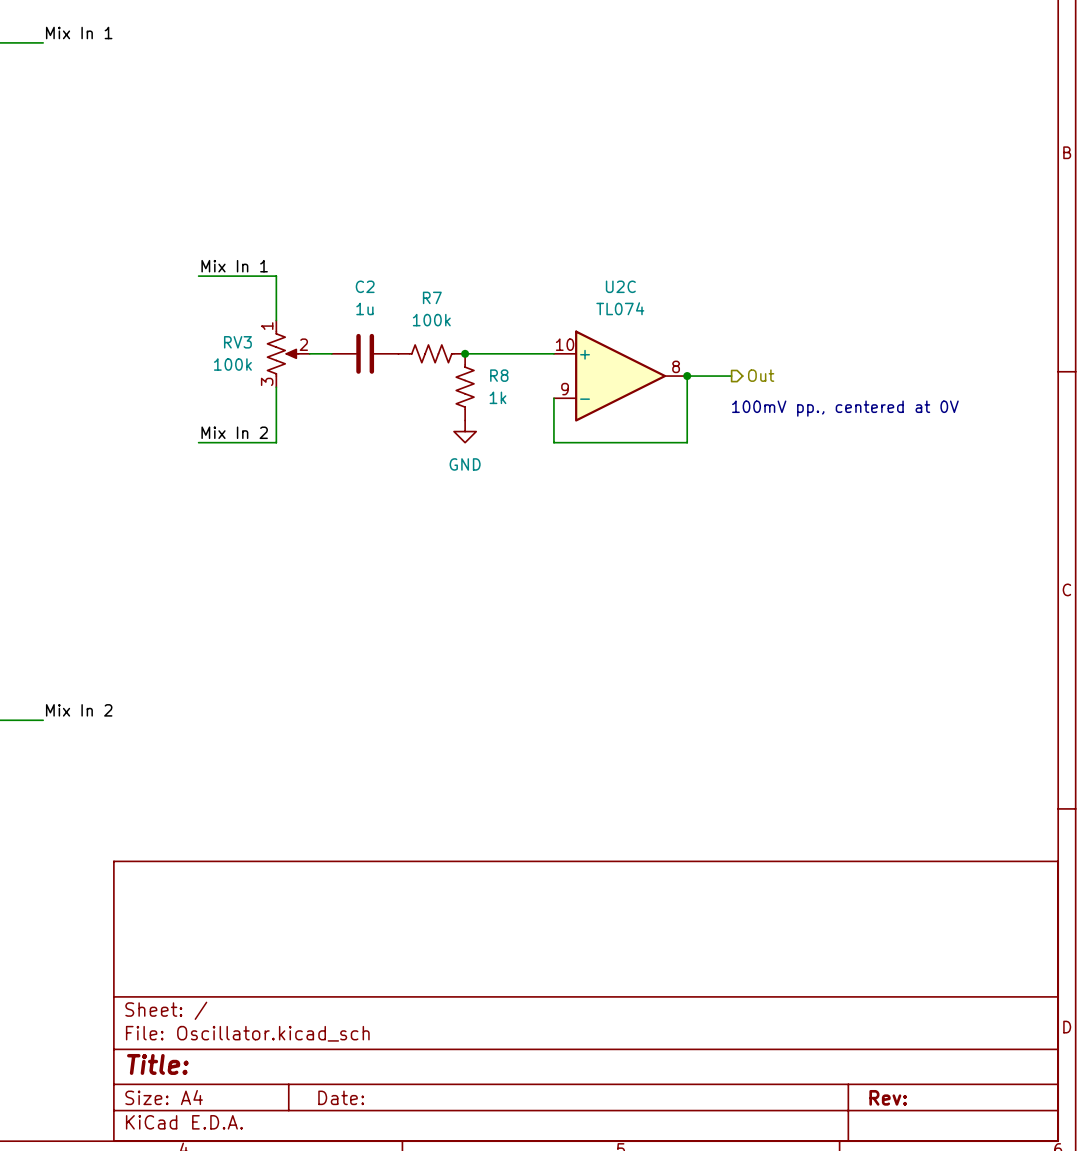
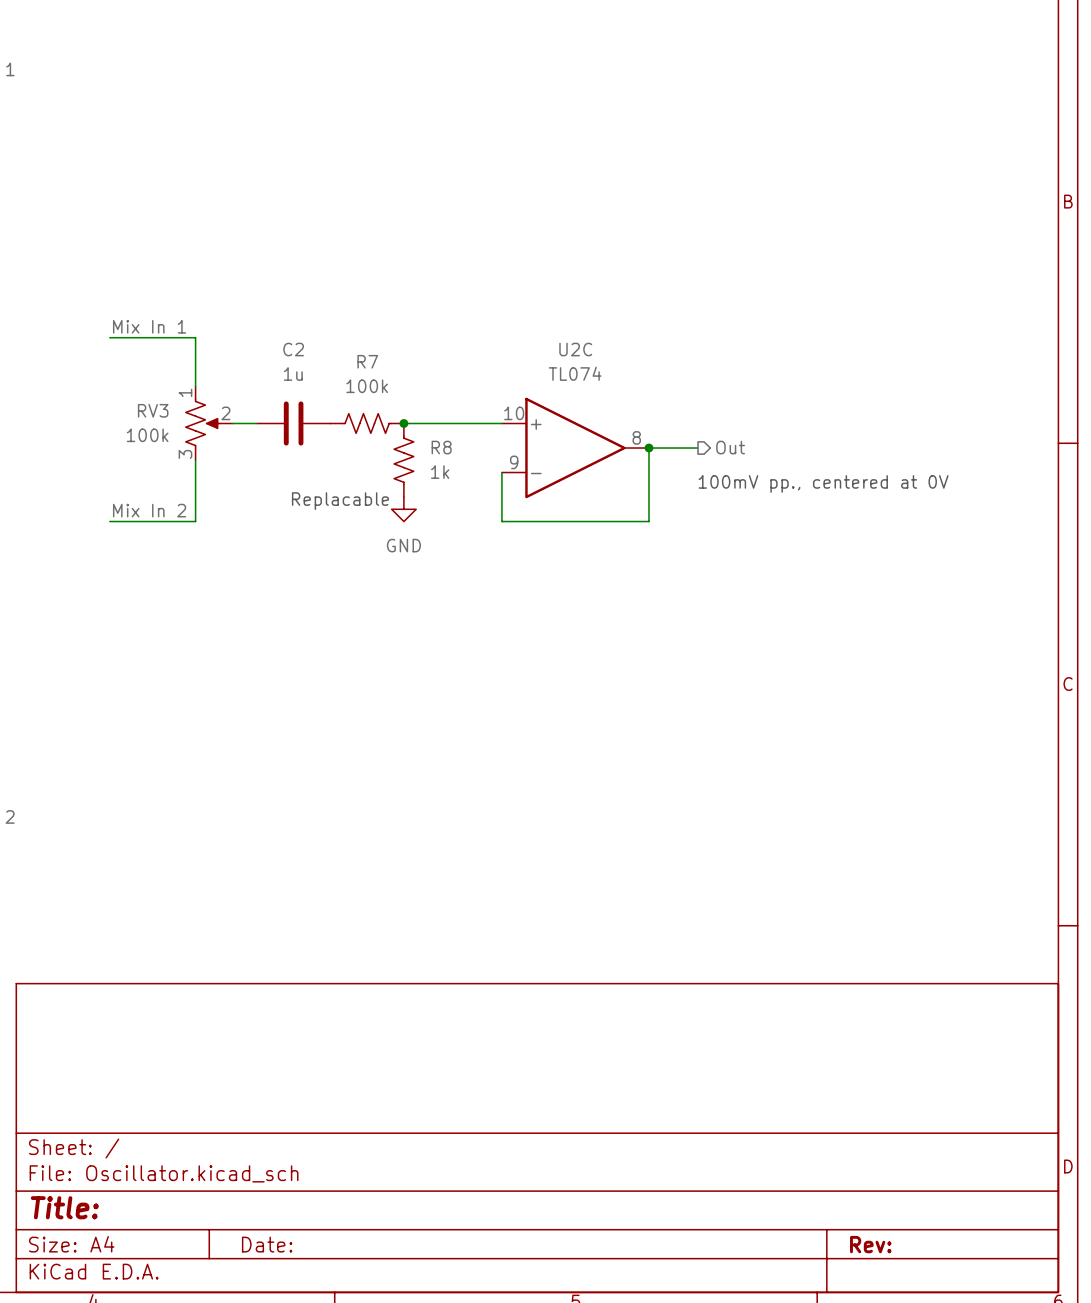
text: none -> Replacable (340, 501)

